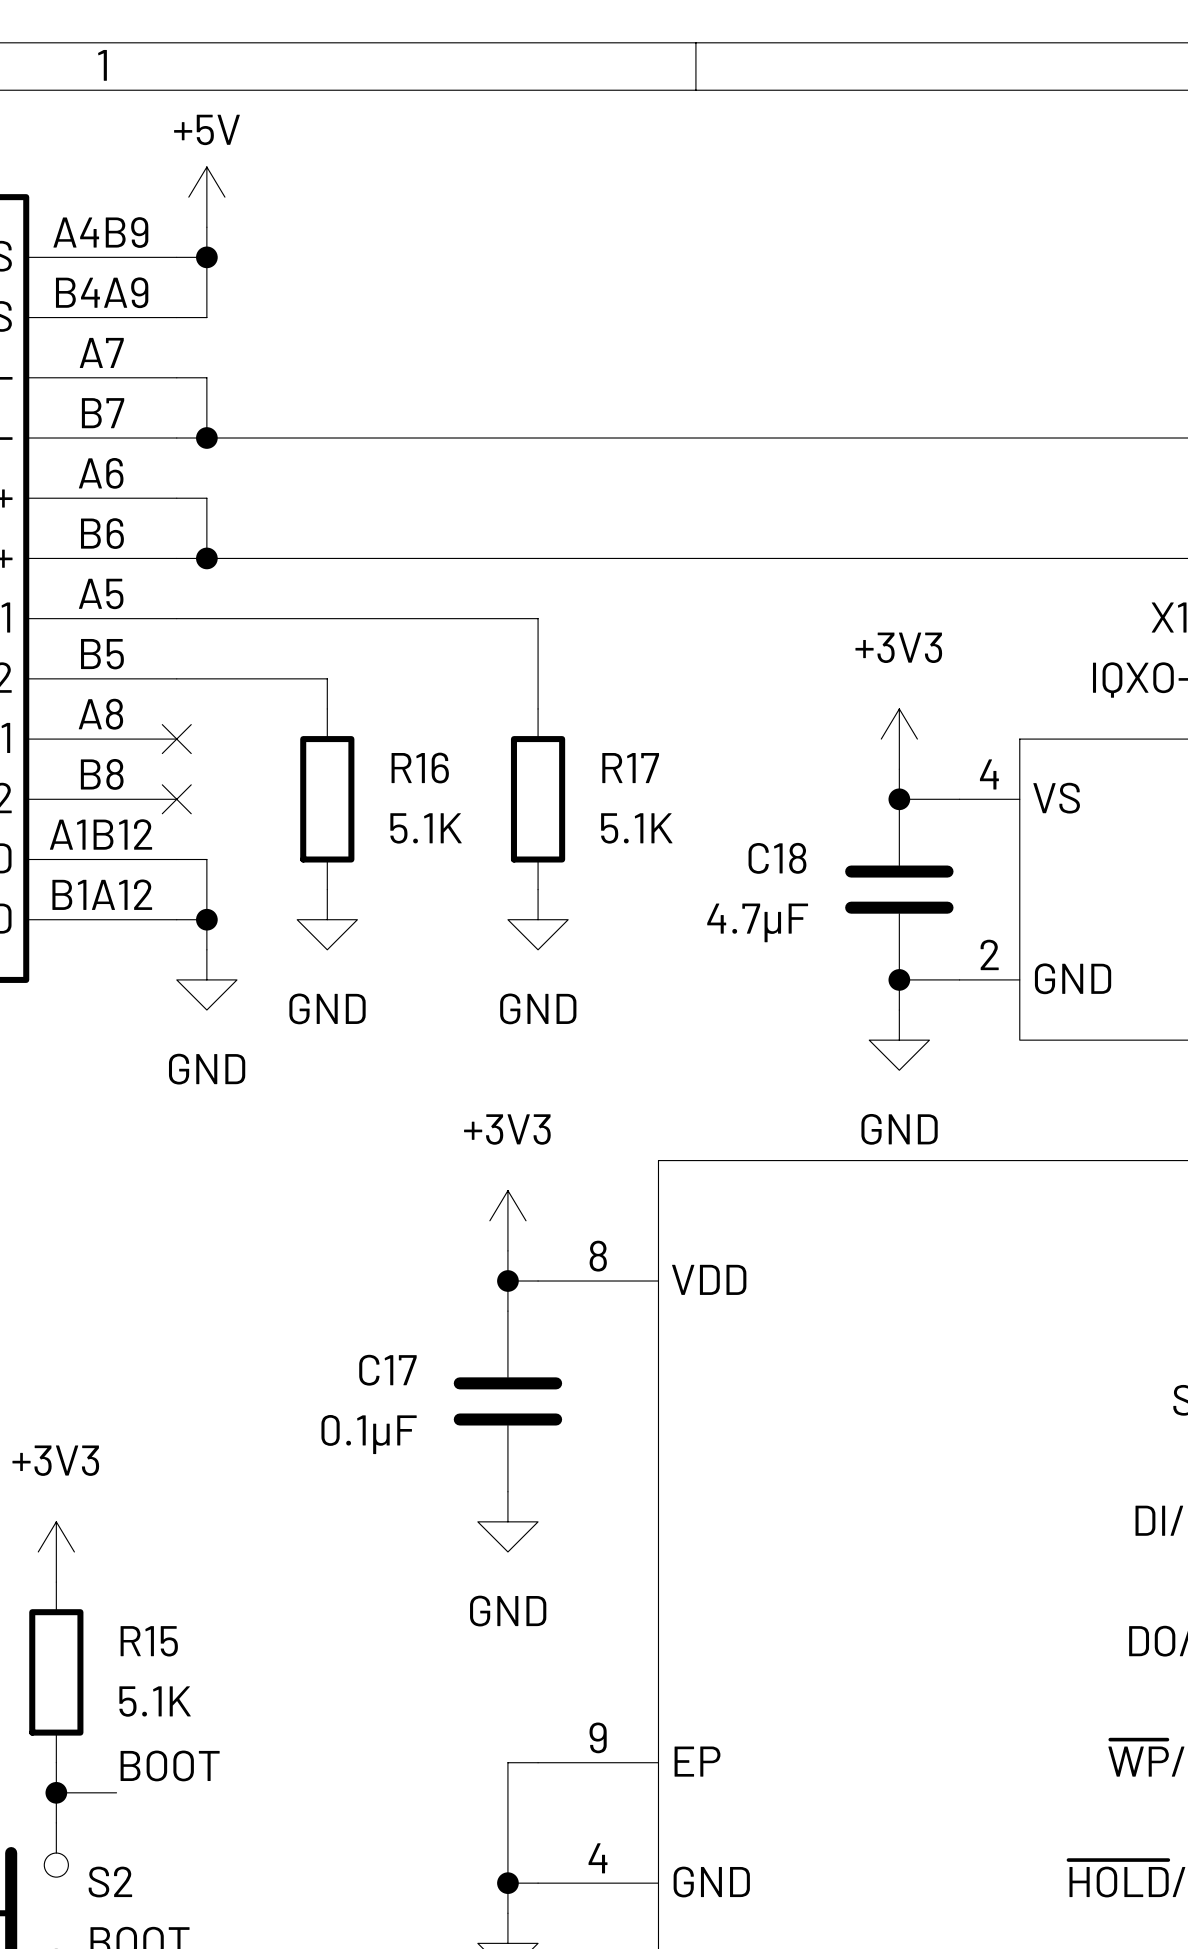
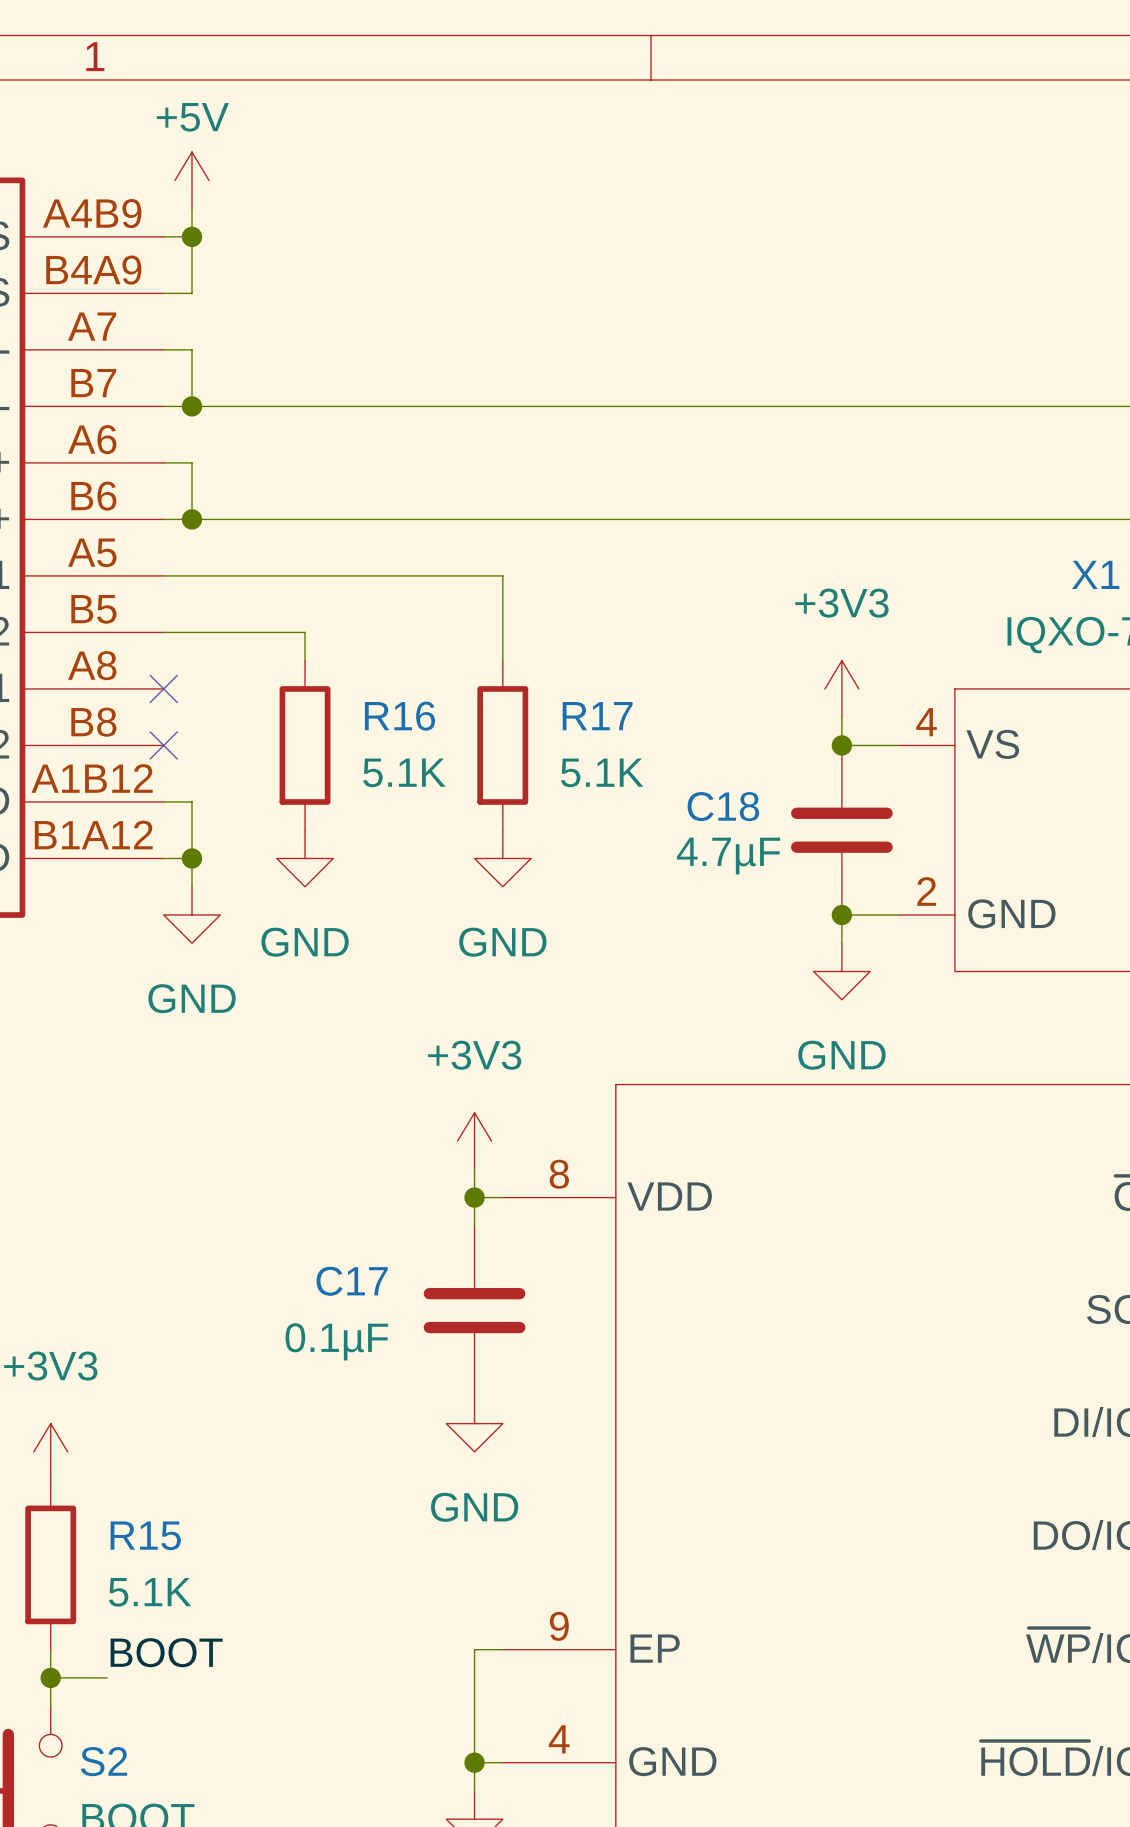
C18 name position: C18 (777, 858) -> C18 (723, 806)
C18 value position: 4.7µF (757, 922) -> 4.7µF (728, 856)

